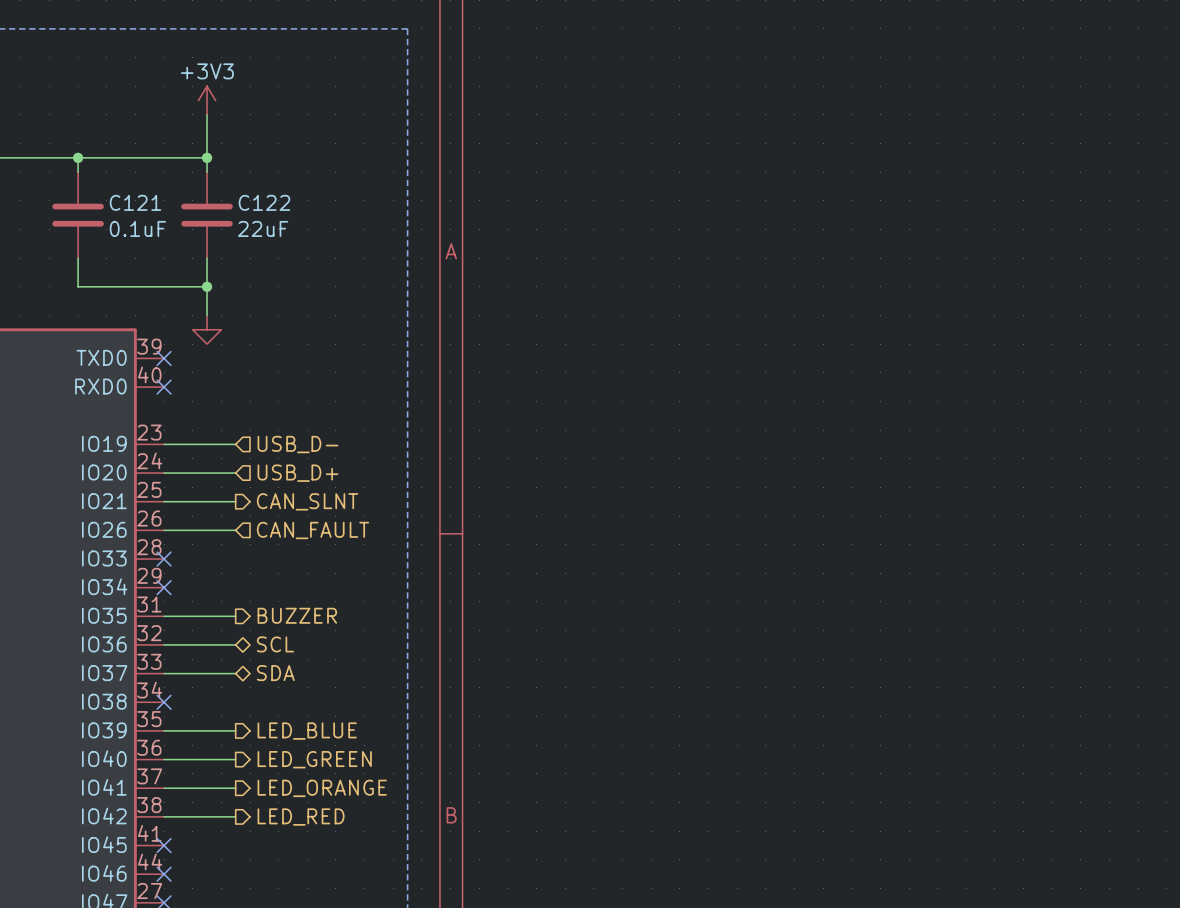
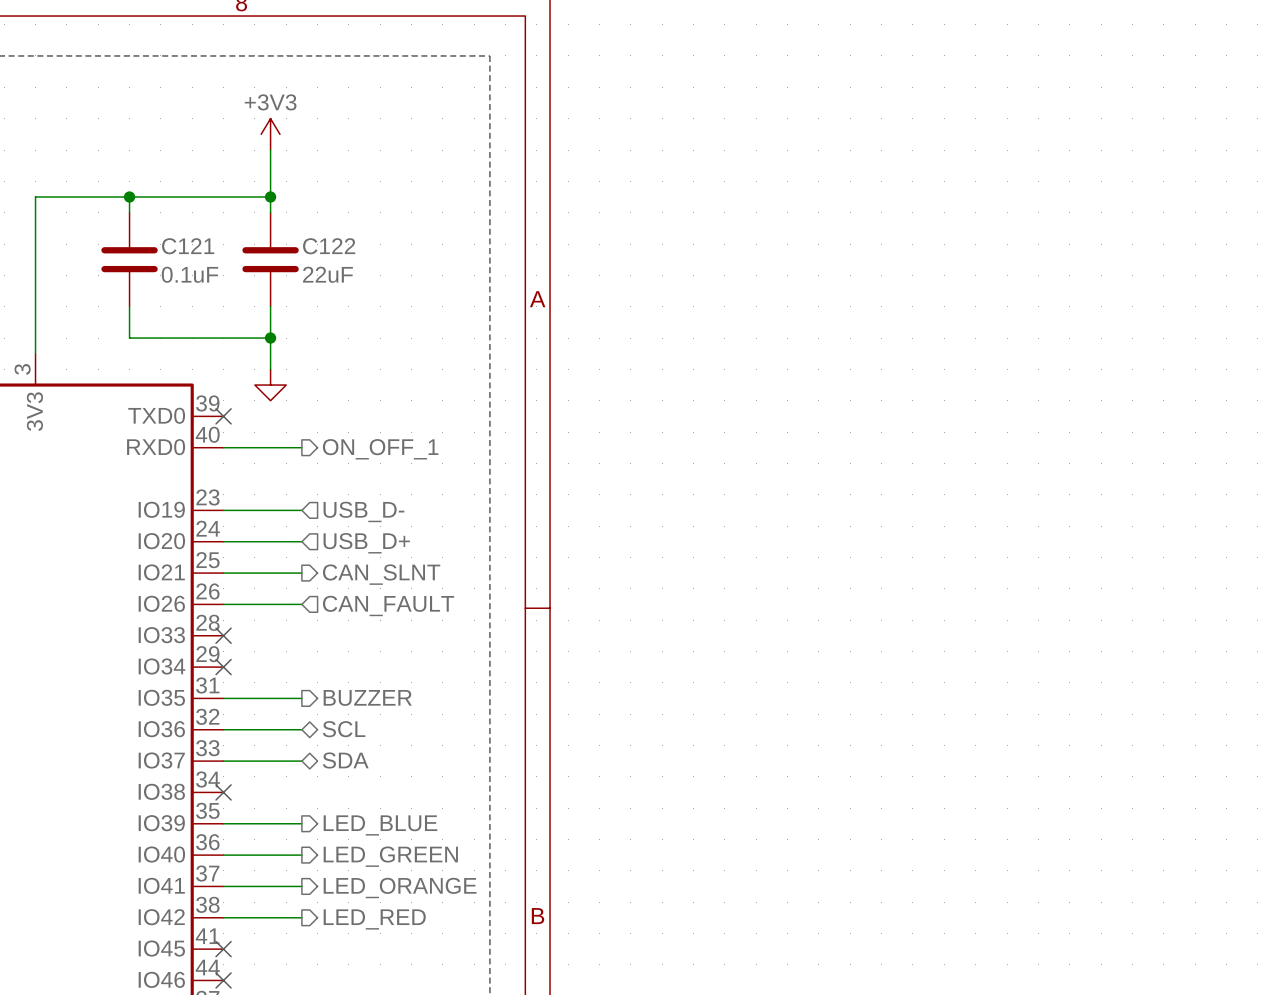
wire: none -> (223, 447) (301, 447)
no-connect mark: (164, 387) -> none
hierarchical label: none -> ON_OFF_1 (380, 449)

